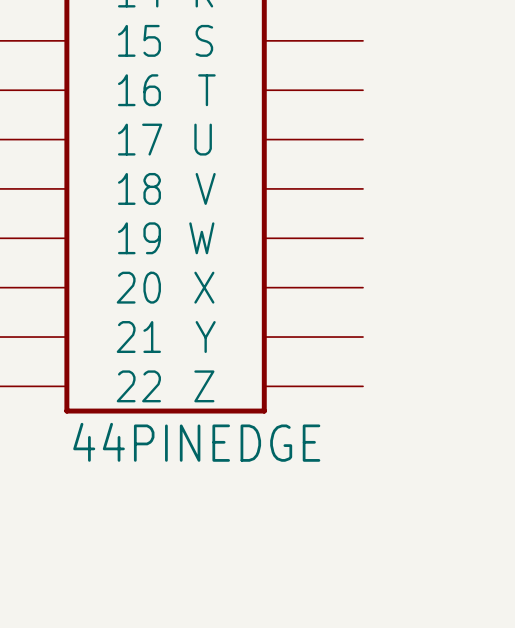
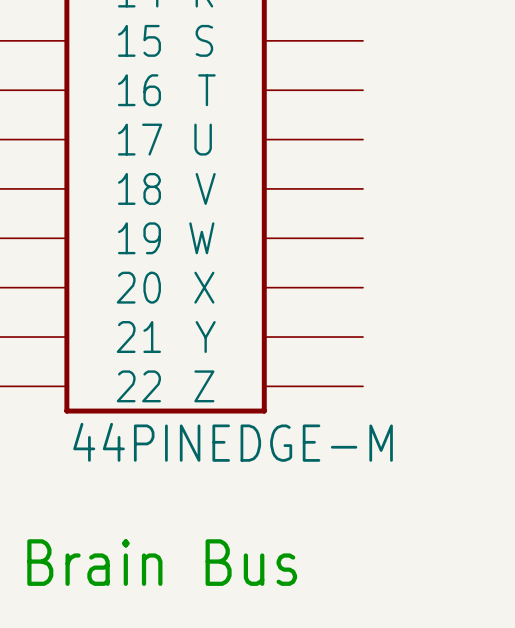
part value: 44PINEDGE (196, 442) -> 44PINEDGE-M (233, 442)
text: none -> Brain Bus (162, 562)

